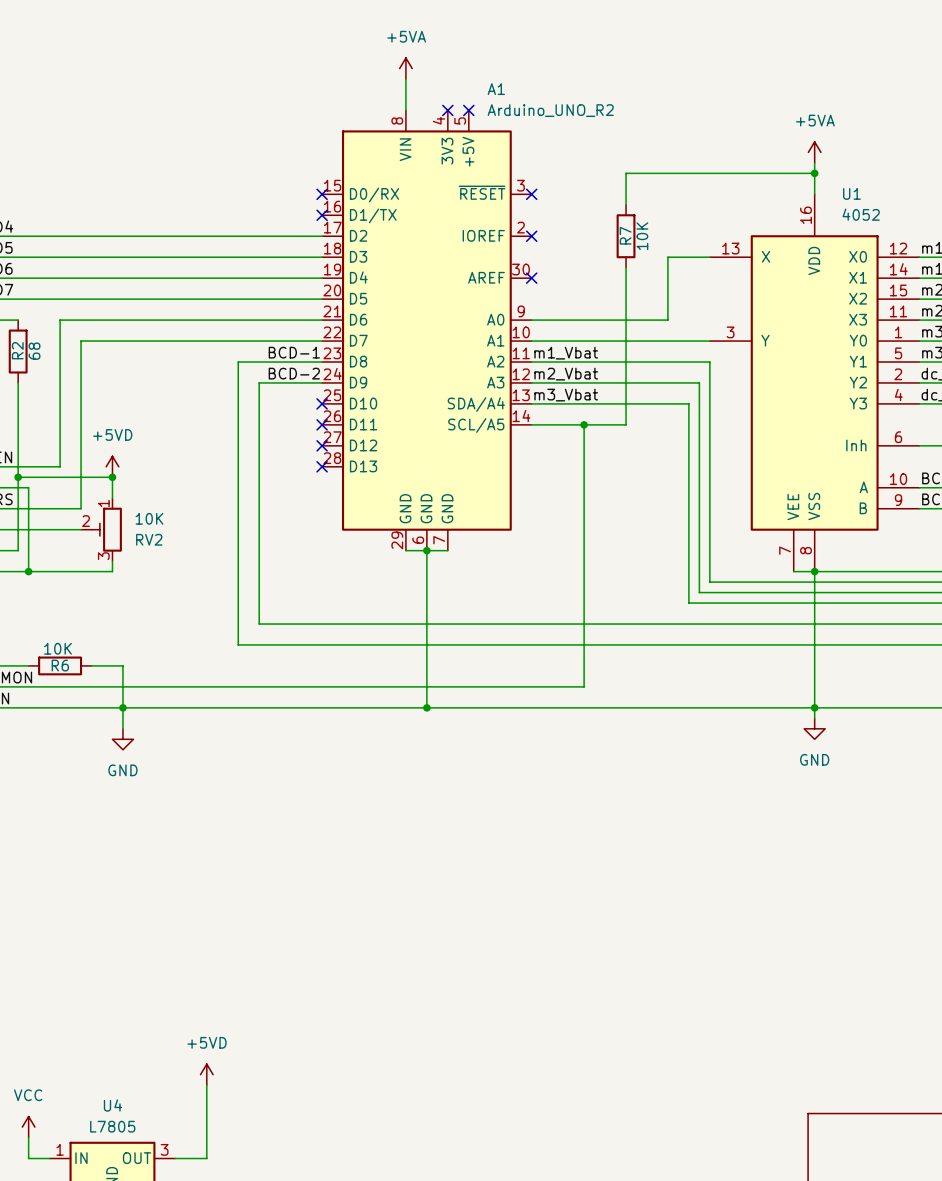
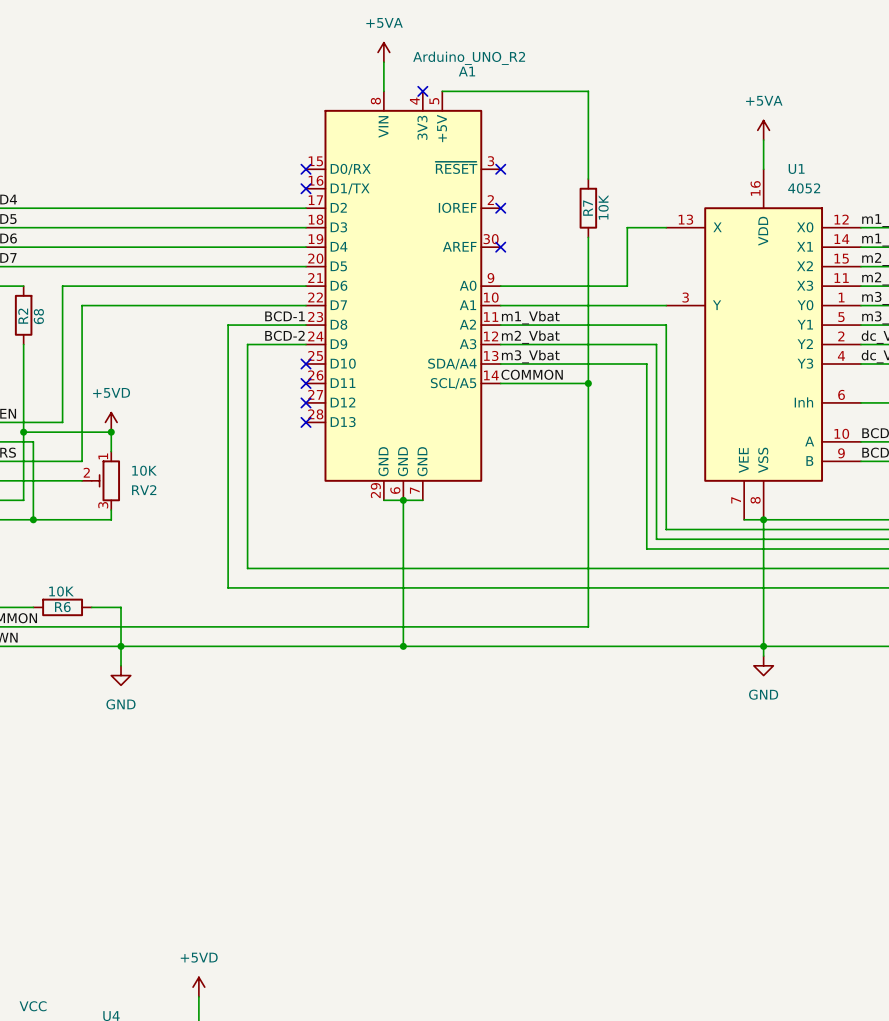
no-connect mark: (468, 110) -> none
A1 value position: Arduino_UNO_R2 (550, 110) -> Arduino_UNO_R2 (469, 58)
wire: (626, 173) (814, 173) -> (588, 149) (588, 91) (442, 91)
junction: (814, 173) -> none
label: none -> COMMON (532, 374)
wire: (584, 424) (584, 686) -> (588, 383) (588, 626) (549, 626)
junction position: (584, 424) -> (588, 383)

